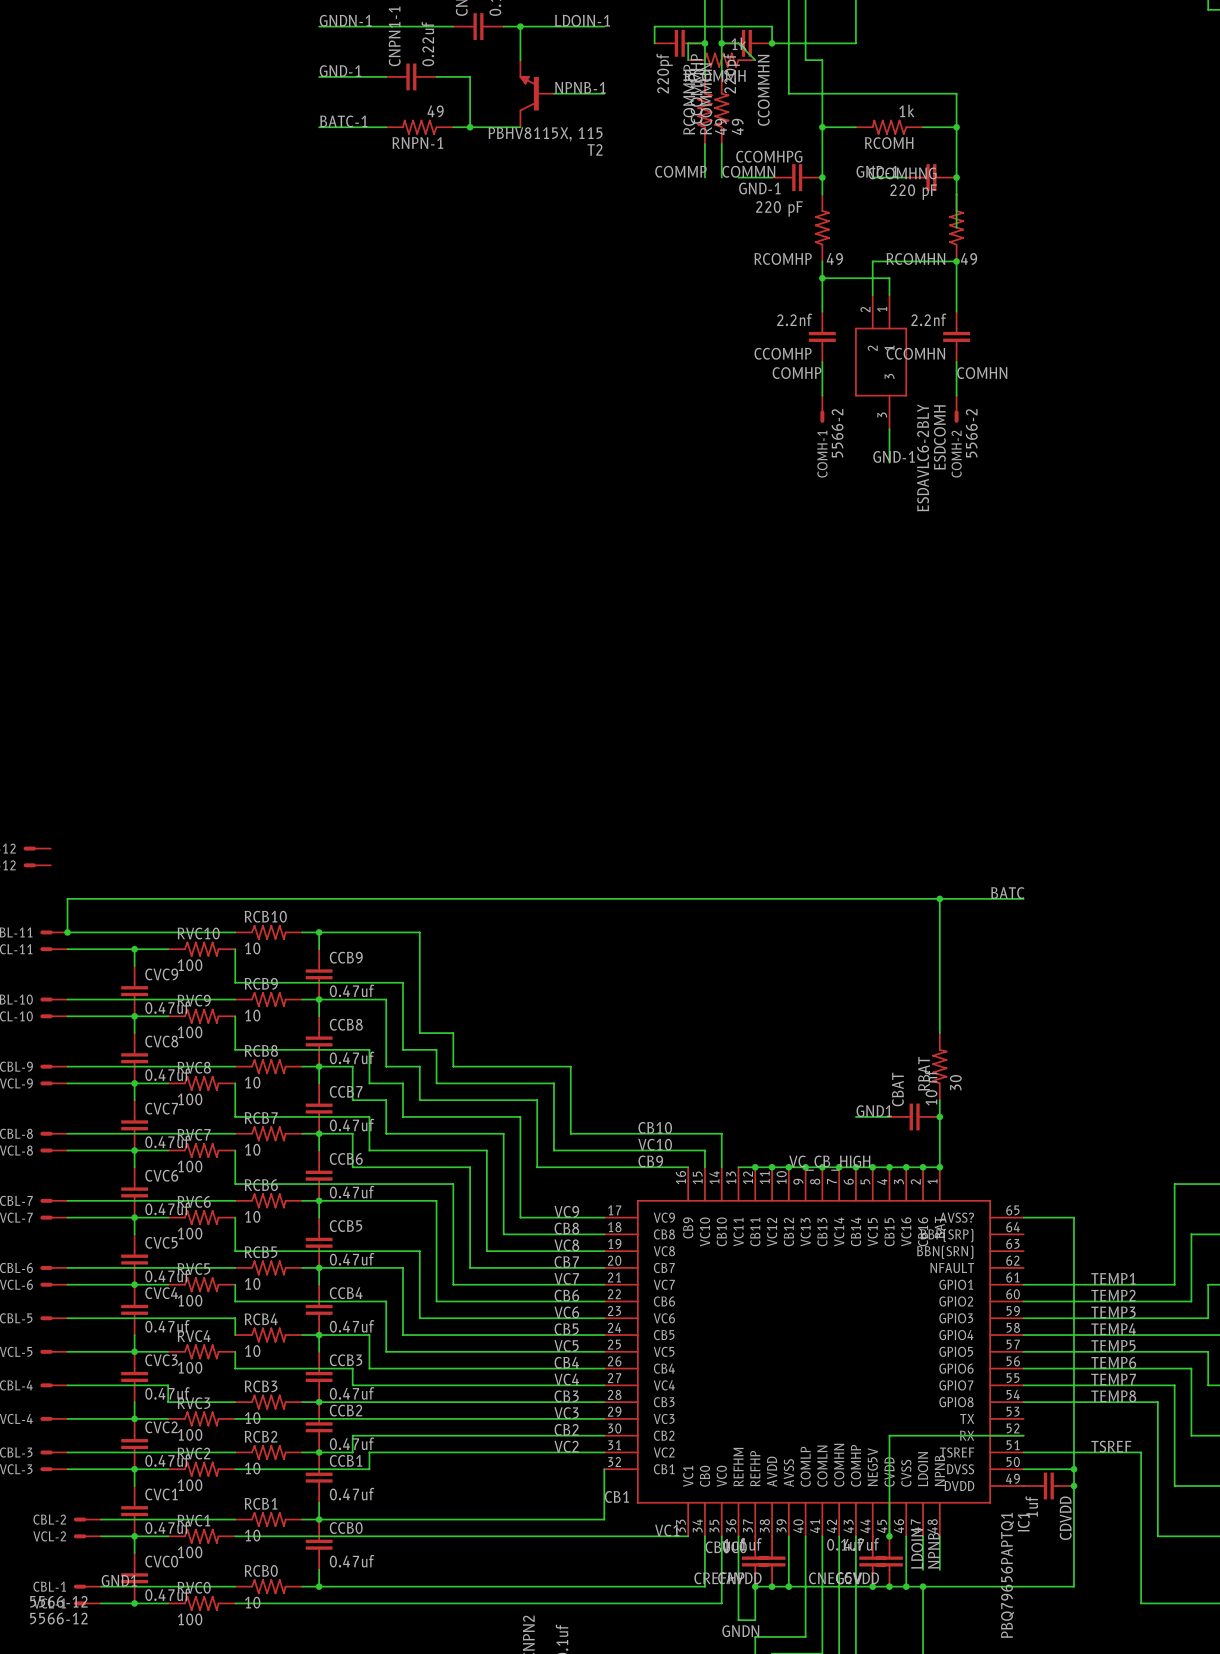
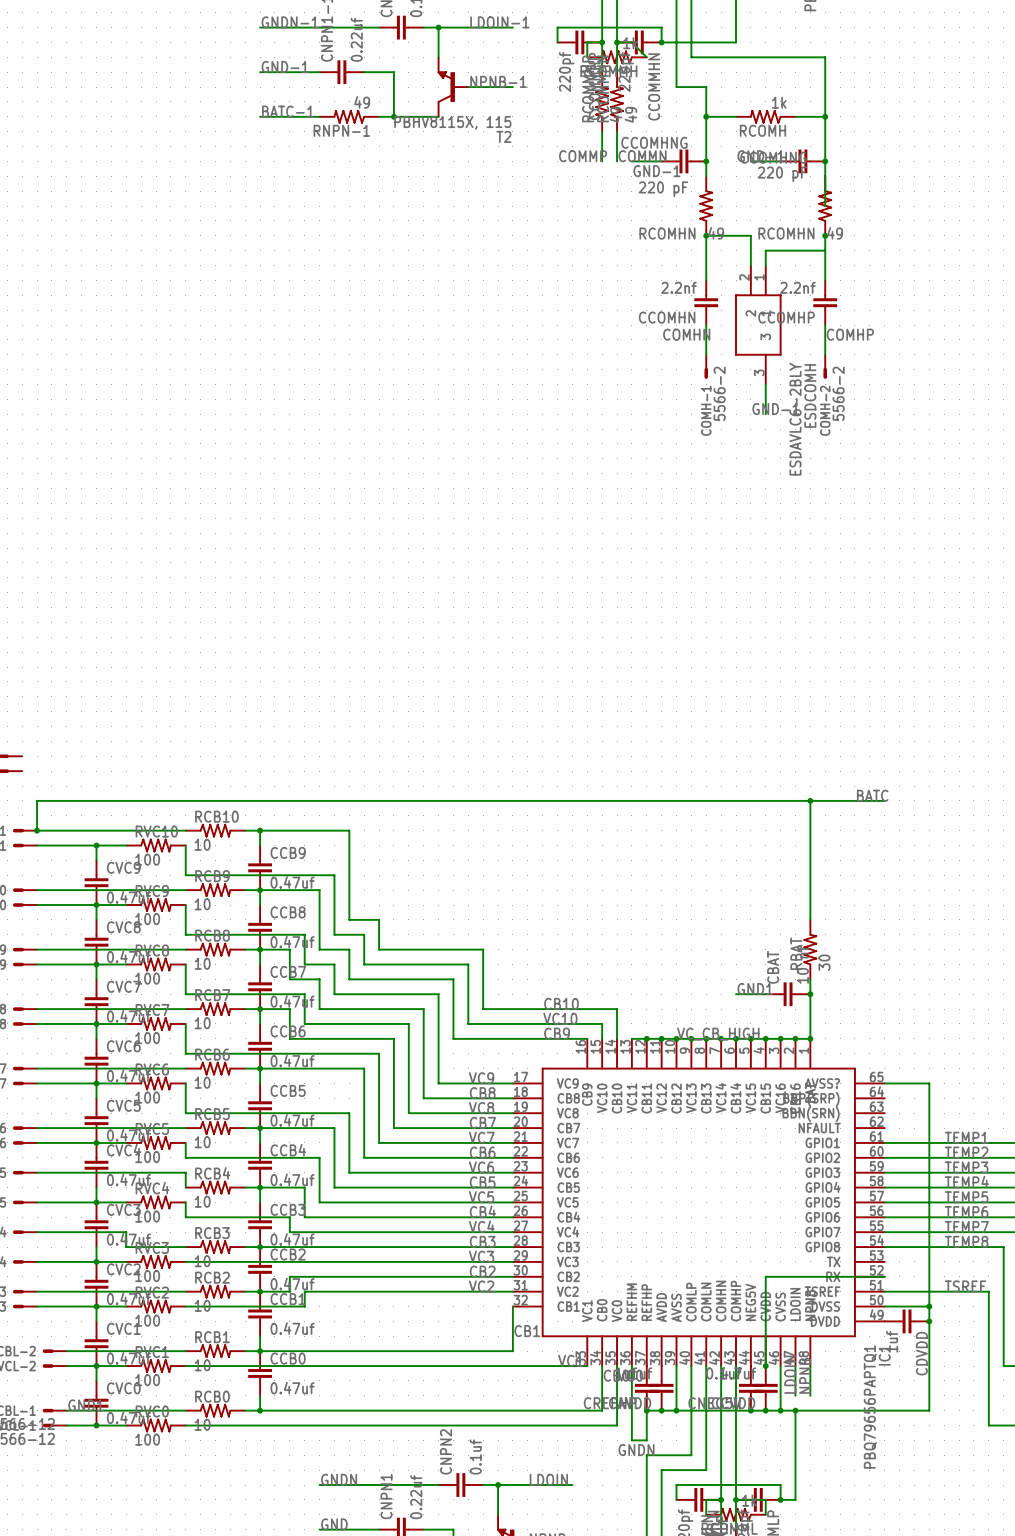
wire: (822, 60) (822, 93) (956, 93) -> (706, 57) (825, 57) (825, 87)
CCOMHPG name: CCOMHPG (769, 156) -> CCOMHNG (654, 142)
RCOMHP name: RCOMHP (783, 258) -> RCOMHN (667, 233)
wire: (872, 261) (956, 261) -> (750, 235) (706, 235)
wire: (822, 278) (889, 278) -> (825, 250) (765, 250)
junction position: (822, 278) -> (706, 235)
CCOMHP name: CCOMHP (783, 353) -> CCOMHN (667, 317)
CCOMHN name: CCOMHN (915, 353) -> CCOMHP (786, 317)
label: COMHP (797, 373) -> COMHN (686, 334)
label: COMHN (982, 373) -> COMHP (850, 334)

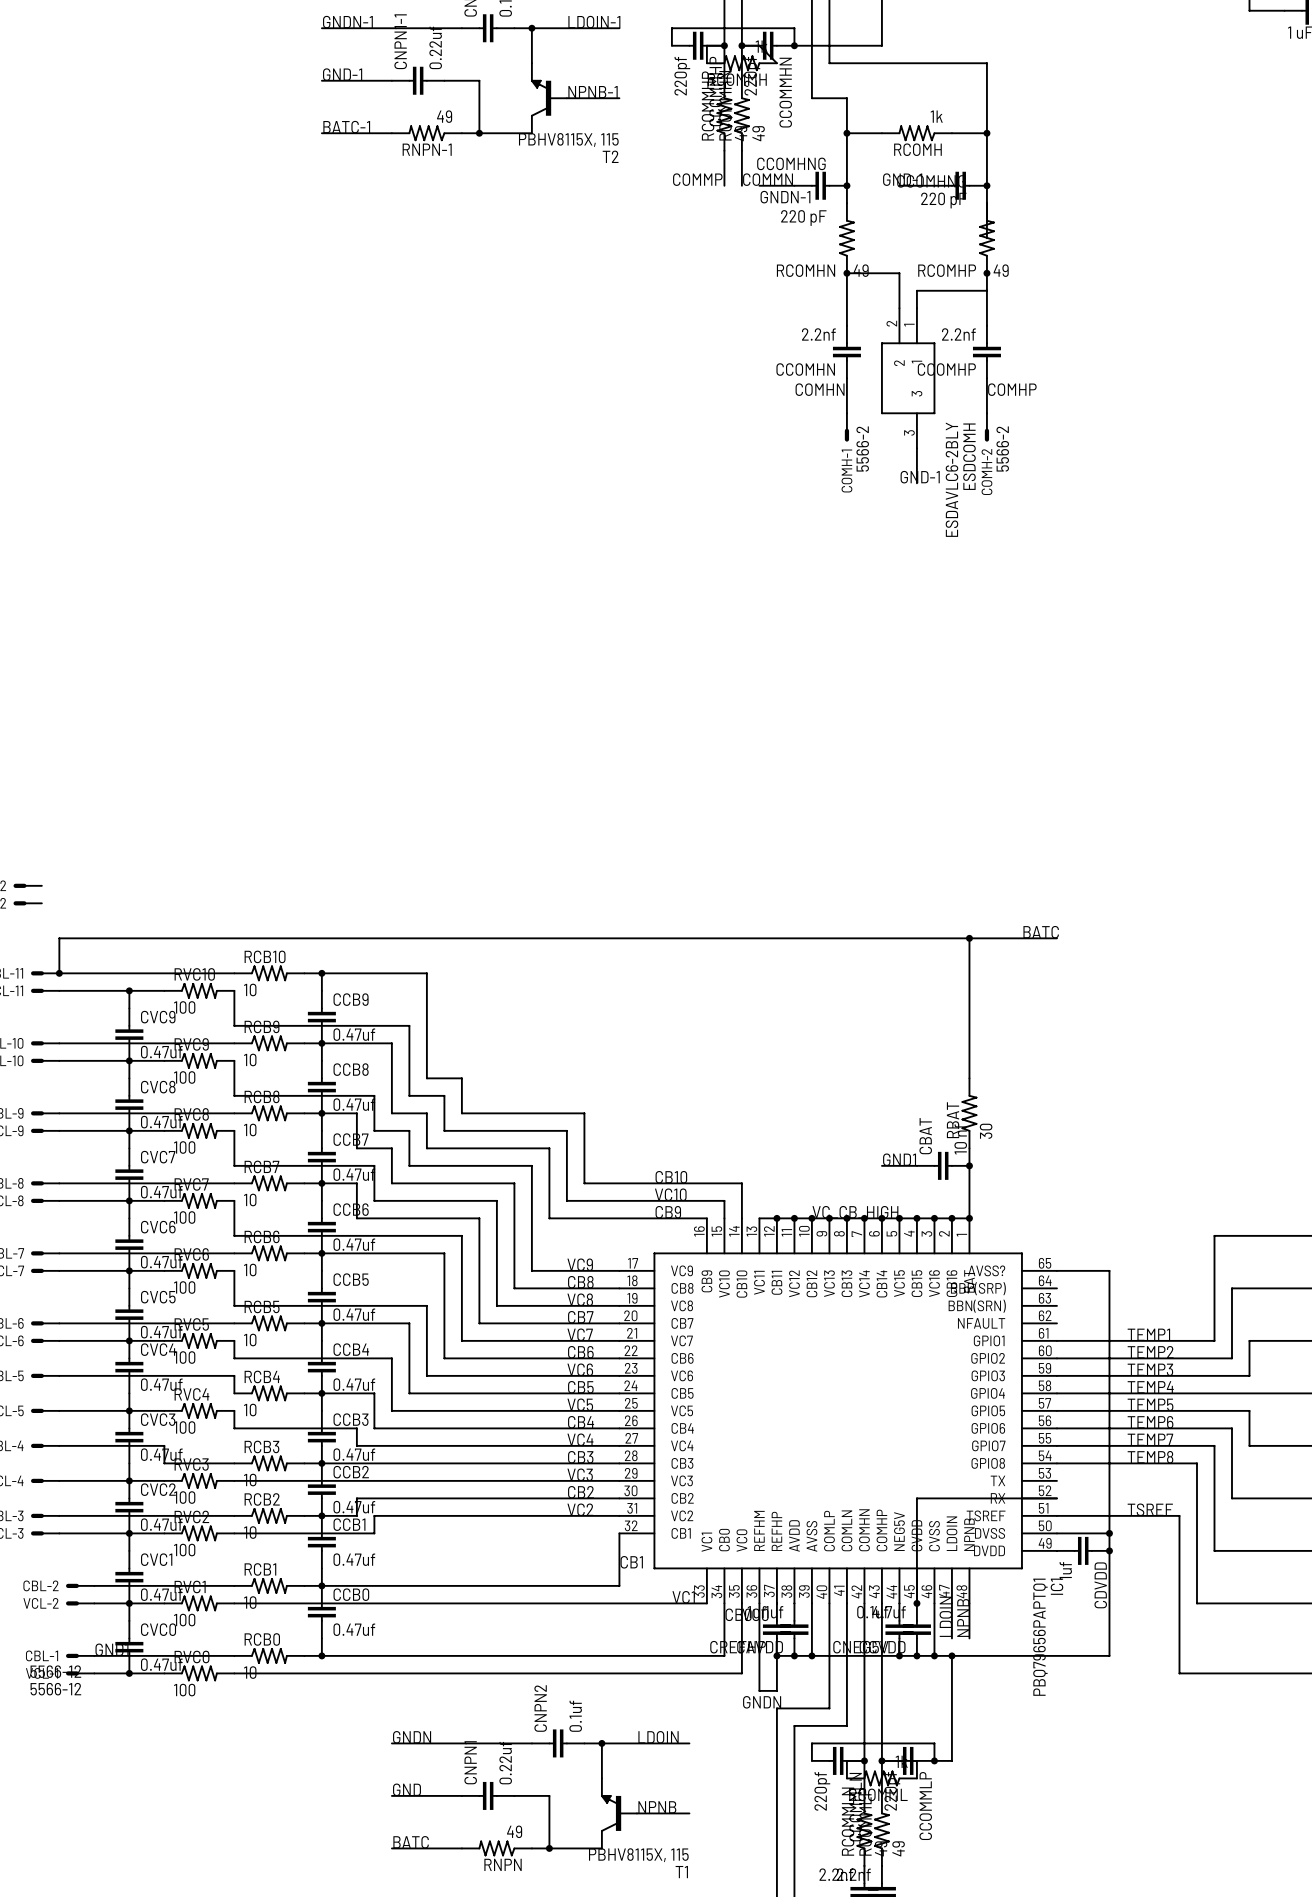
label: GND-1 (656, 171) -> GNDN-1 (785, 197)
RCOMHN name: RCOMHN (786, 233) -> RCOMHP (947, 270)

